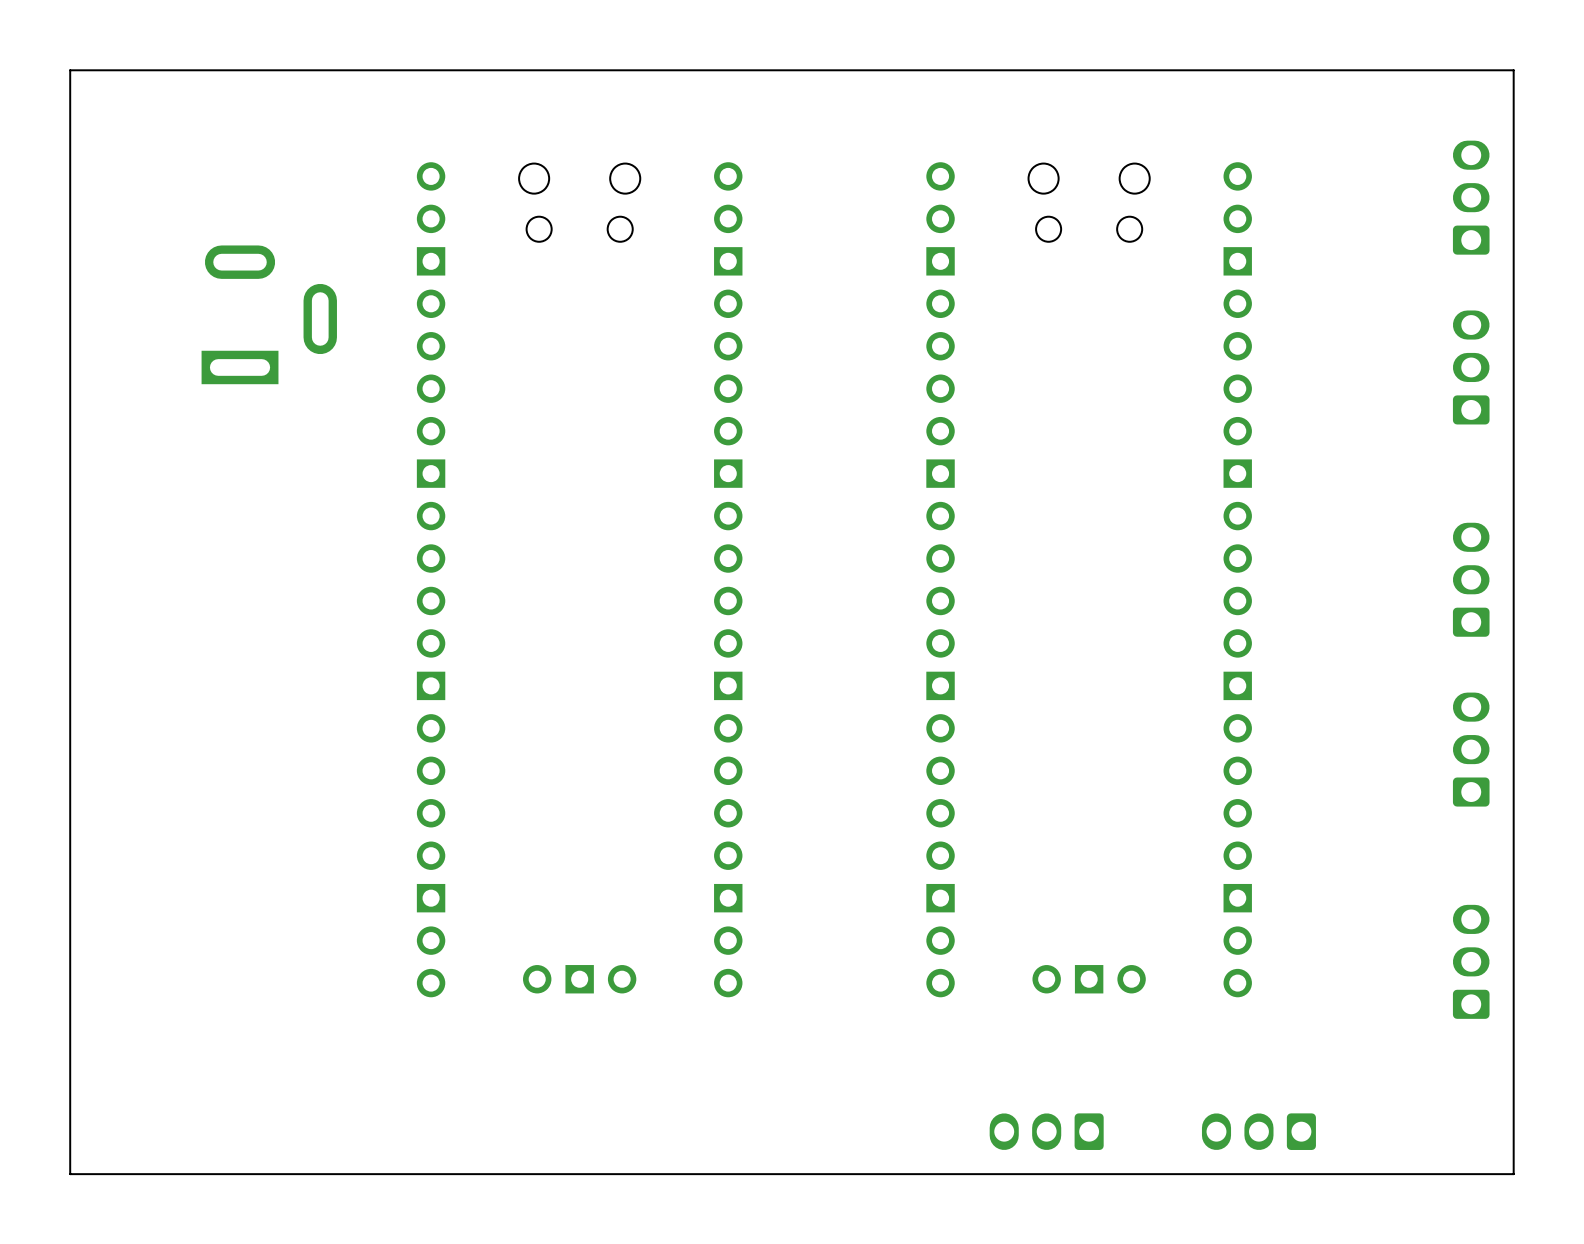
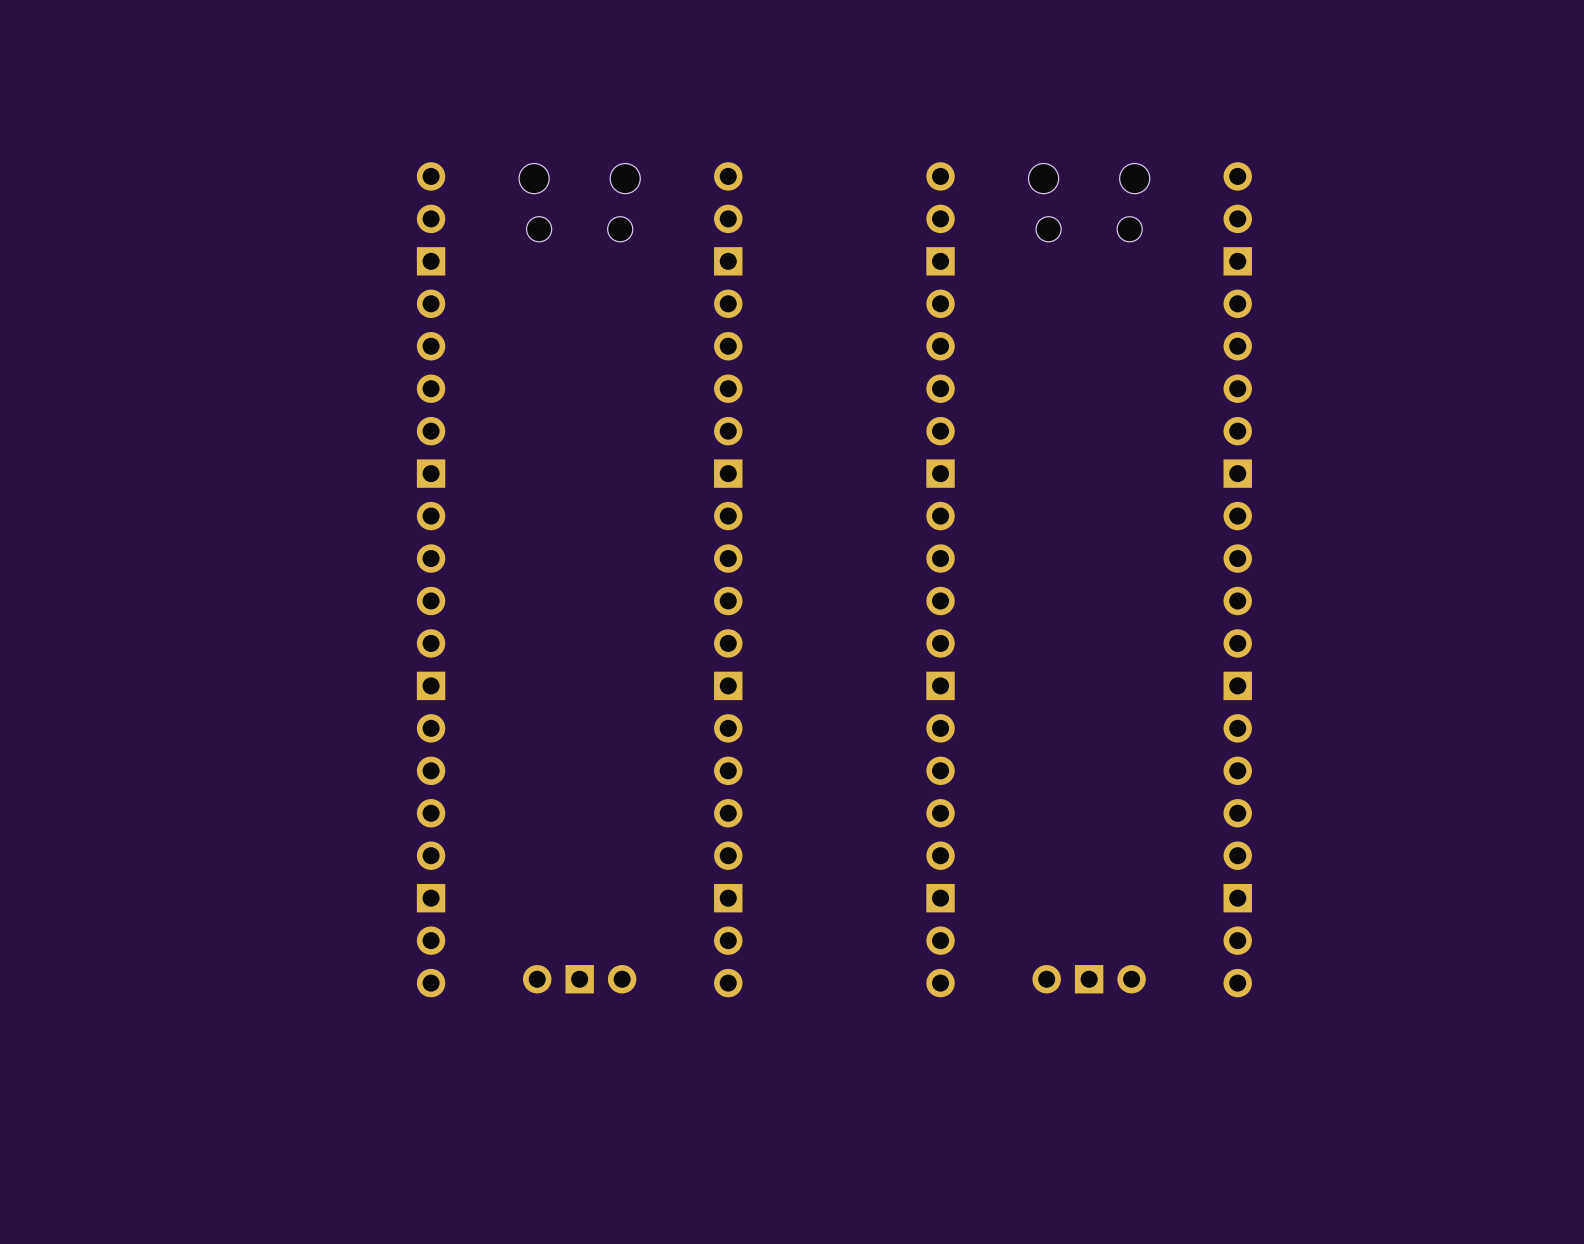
board edge: (1513, 70) (70, 70) (70, 1174) (1513, 1174) (1513, 70) -> none
part: (1471, 197) -> none
part: (269, 314) -> none
part: (1471, 367) -> none
part: (1471, 579) -> none
part: (1471, 749) -> none
part: (1471, 961) -> none
part: (1046, 1131) -> none
part: (1258, 1131) -> none

